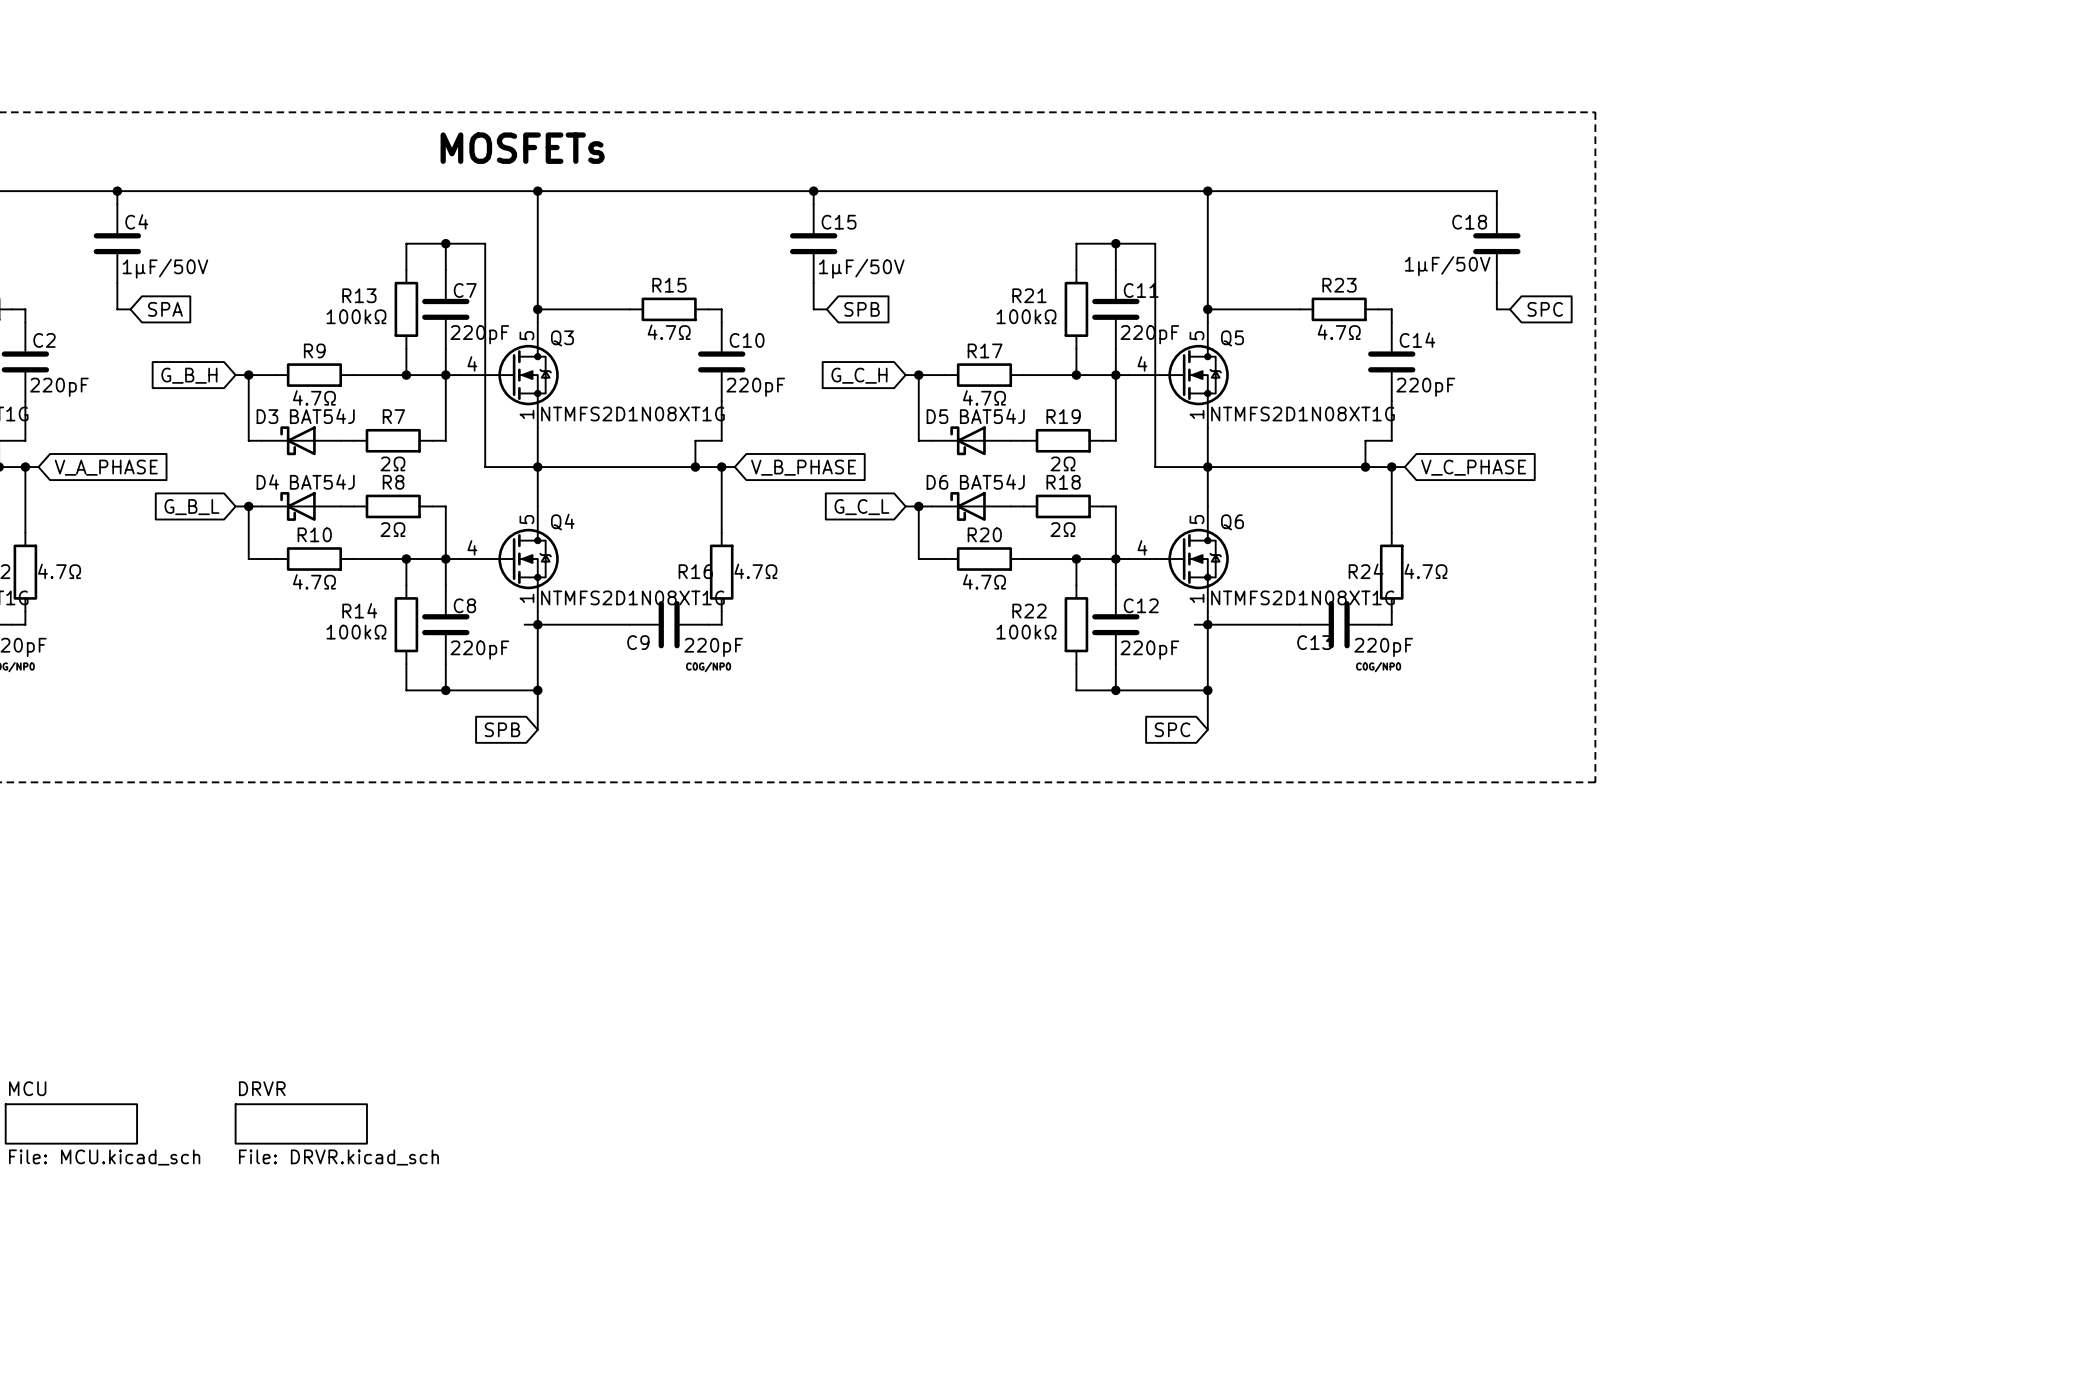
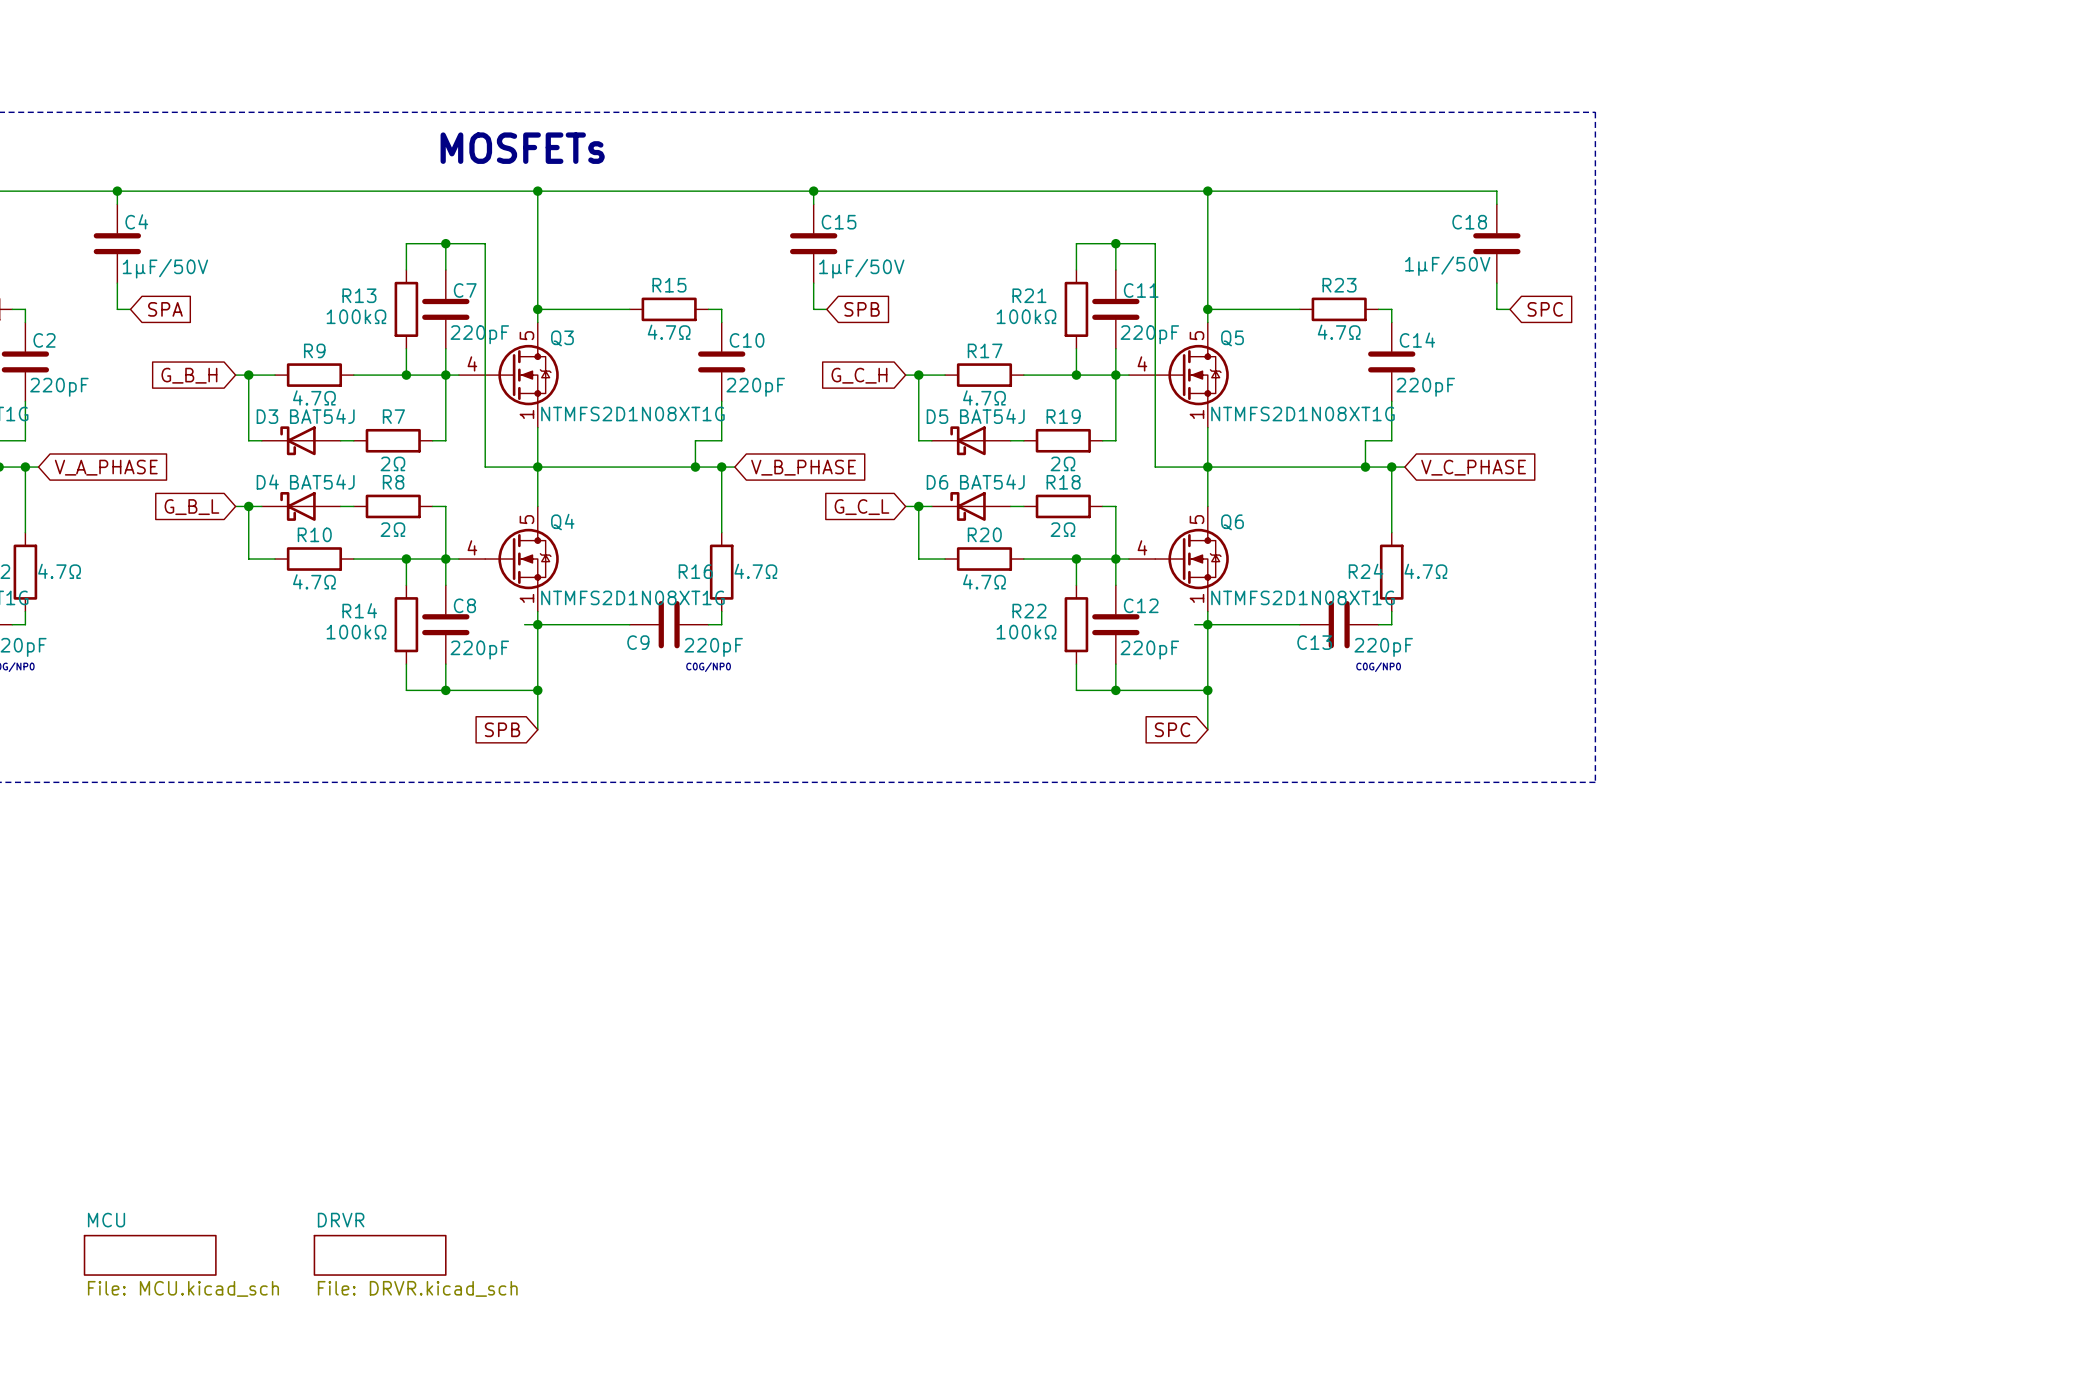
sheet MCU position: (71, 1123) -> (150, 1255)
sheet DRVR position: (301, 1123) -> (380, 1255)

